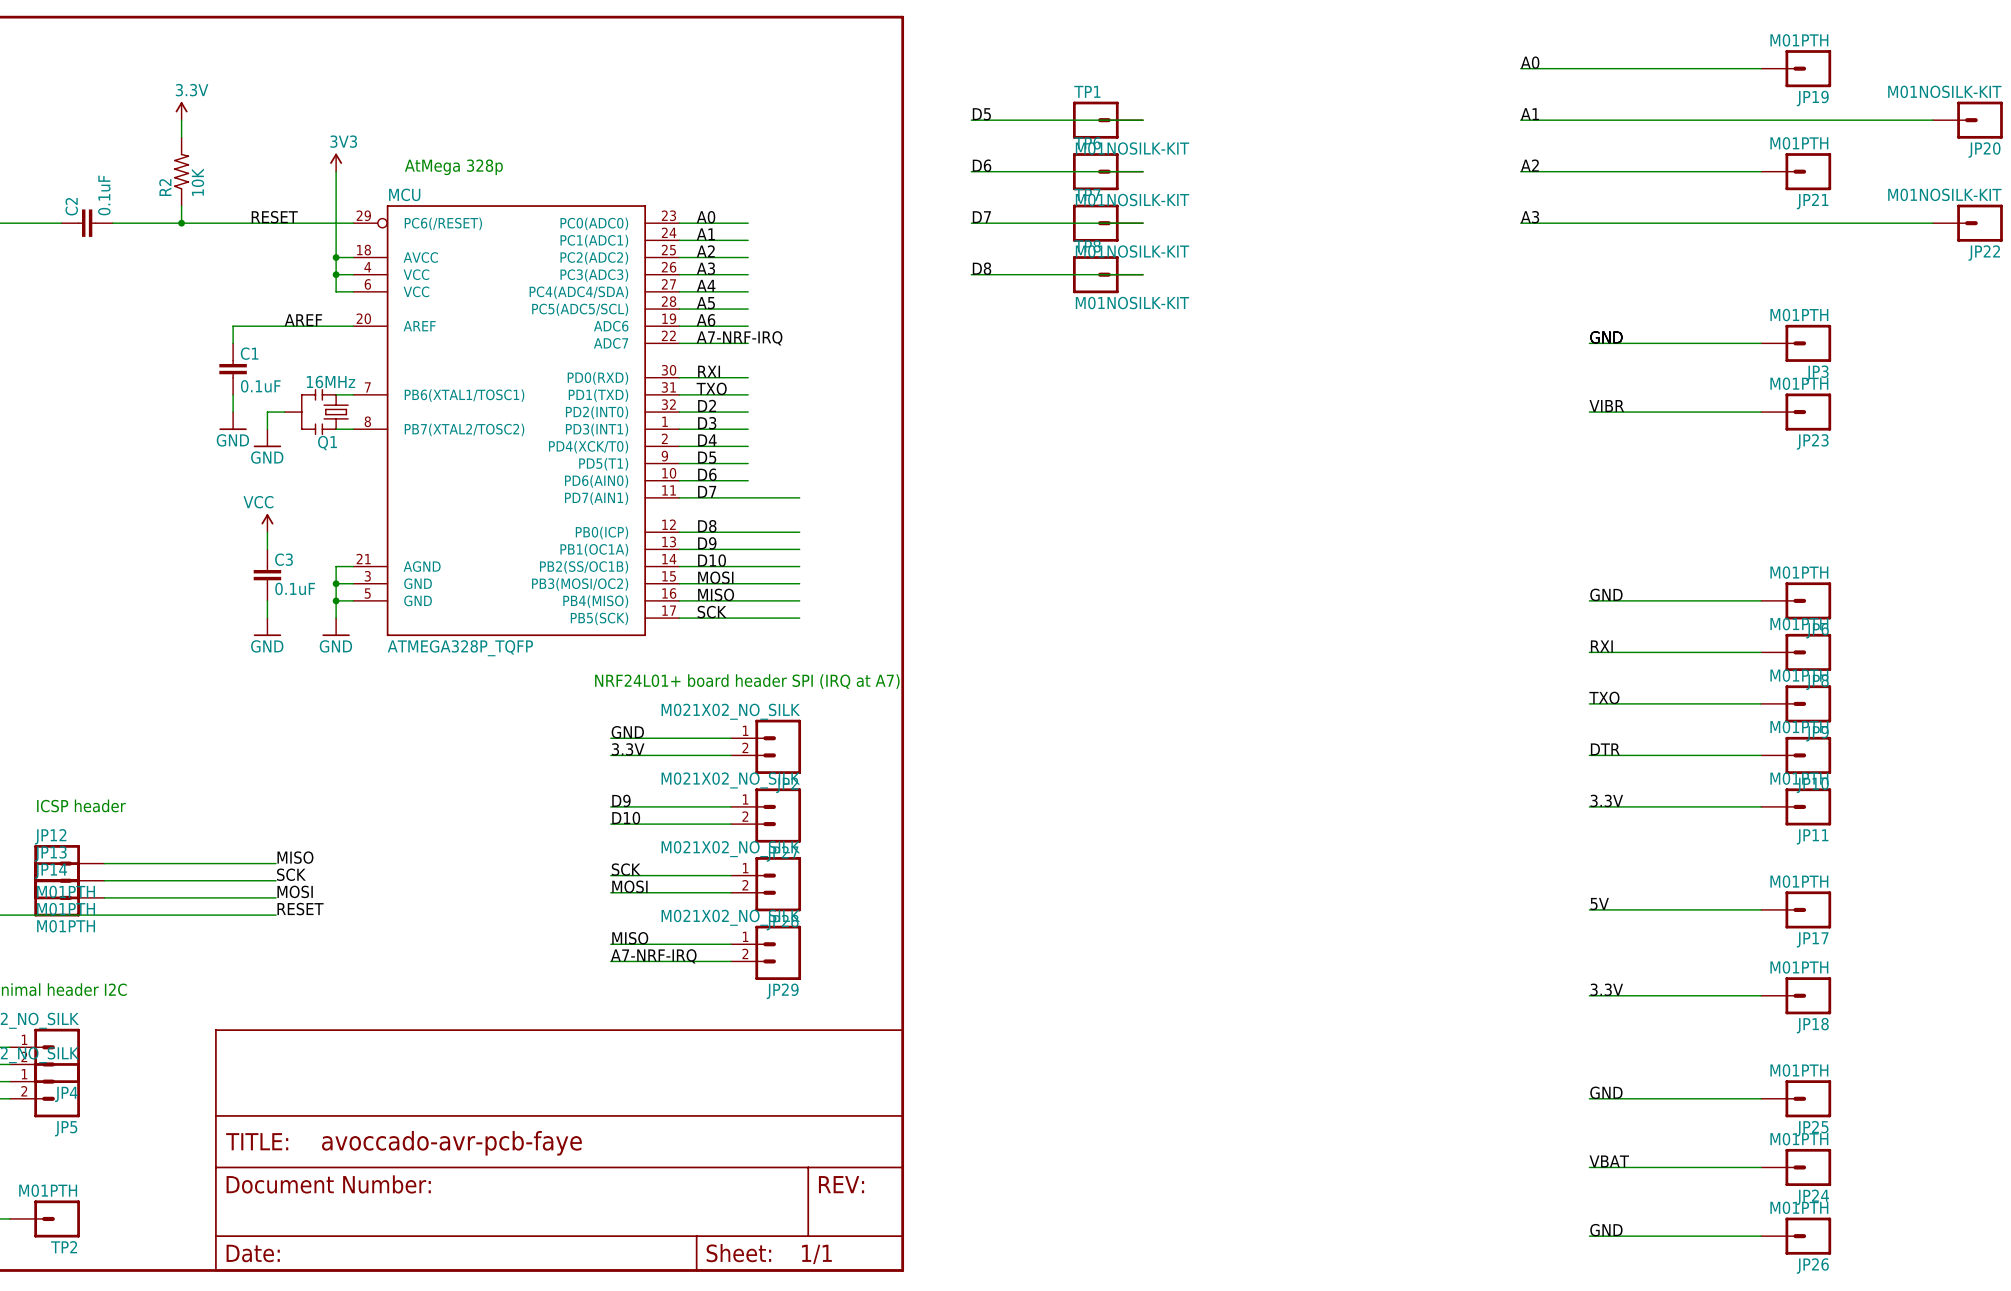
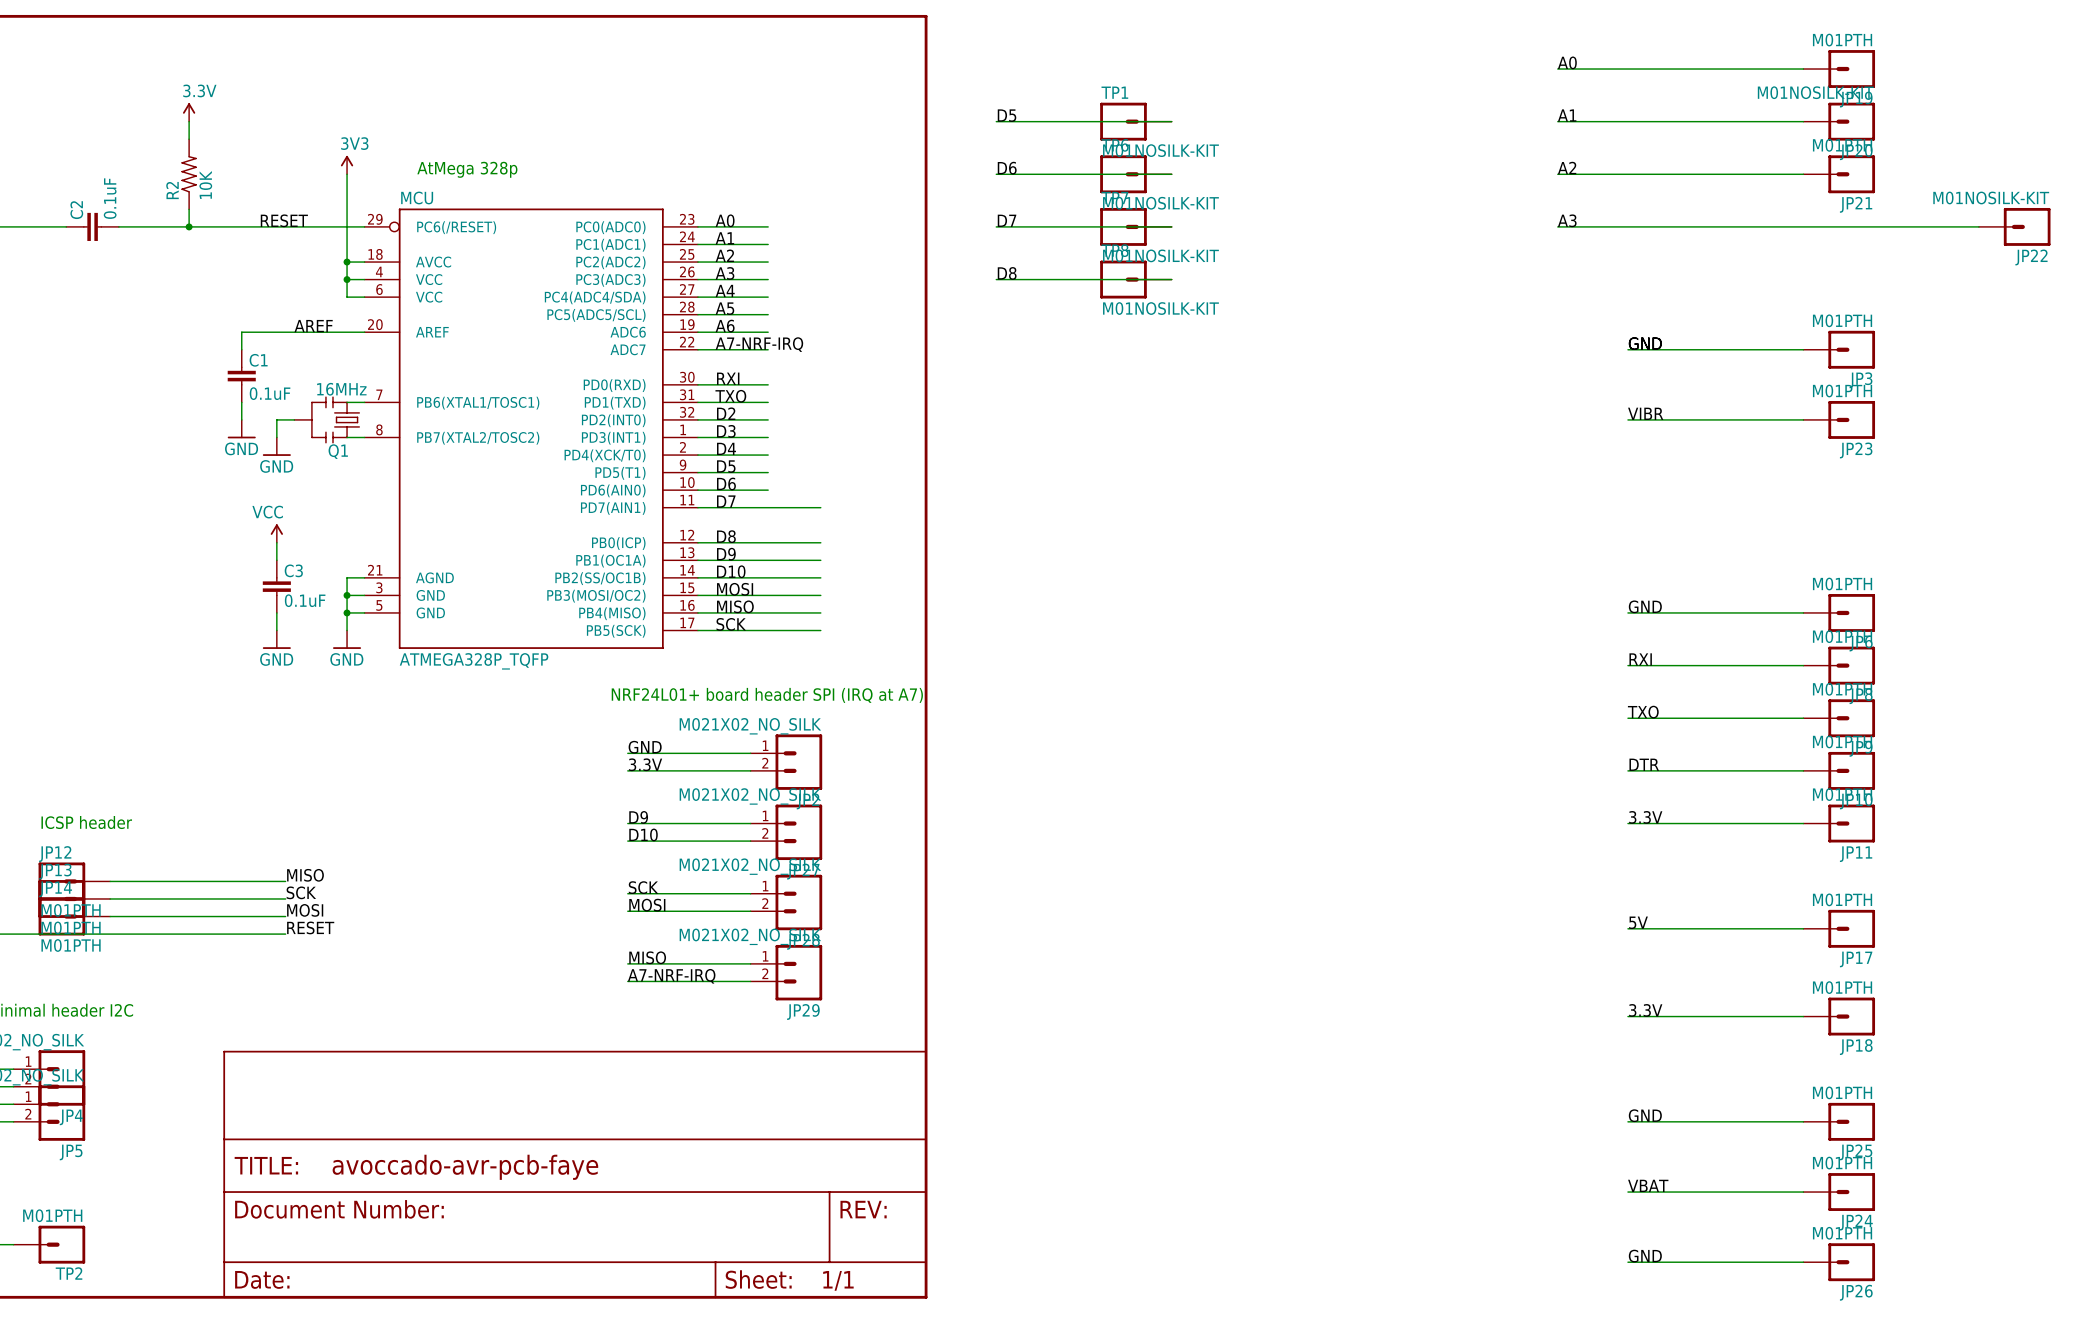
wire: (1761, 120) (1932, 120) -> none
JP20 position: (1967, 120) -> (1839, 121)

